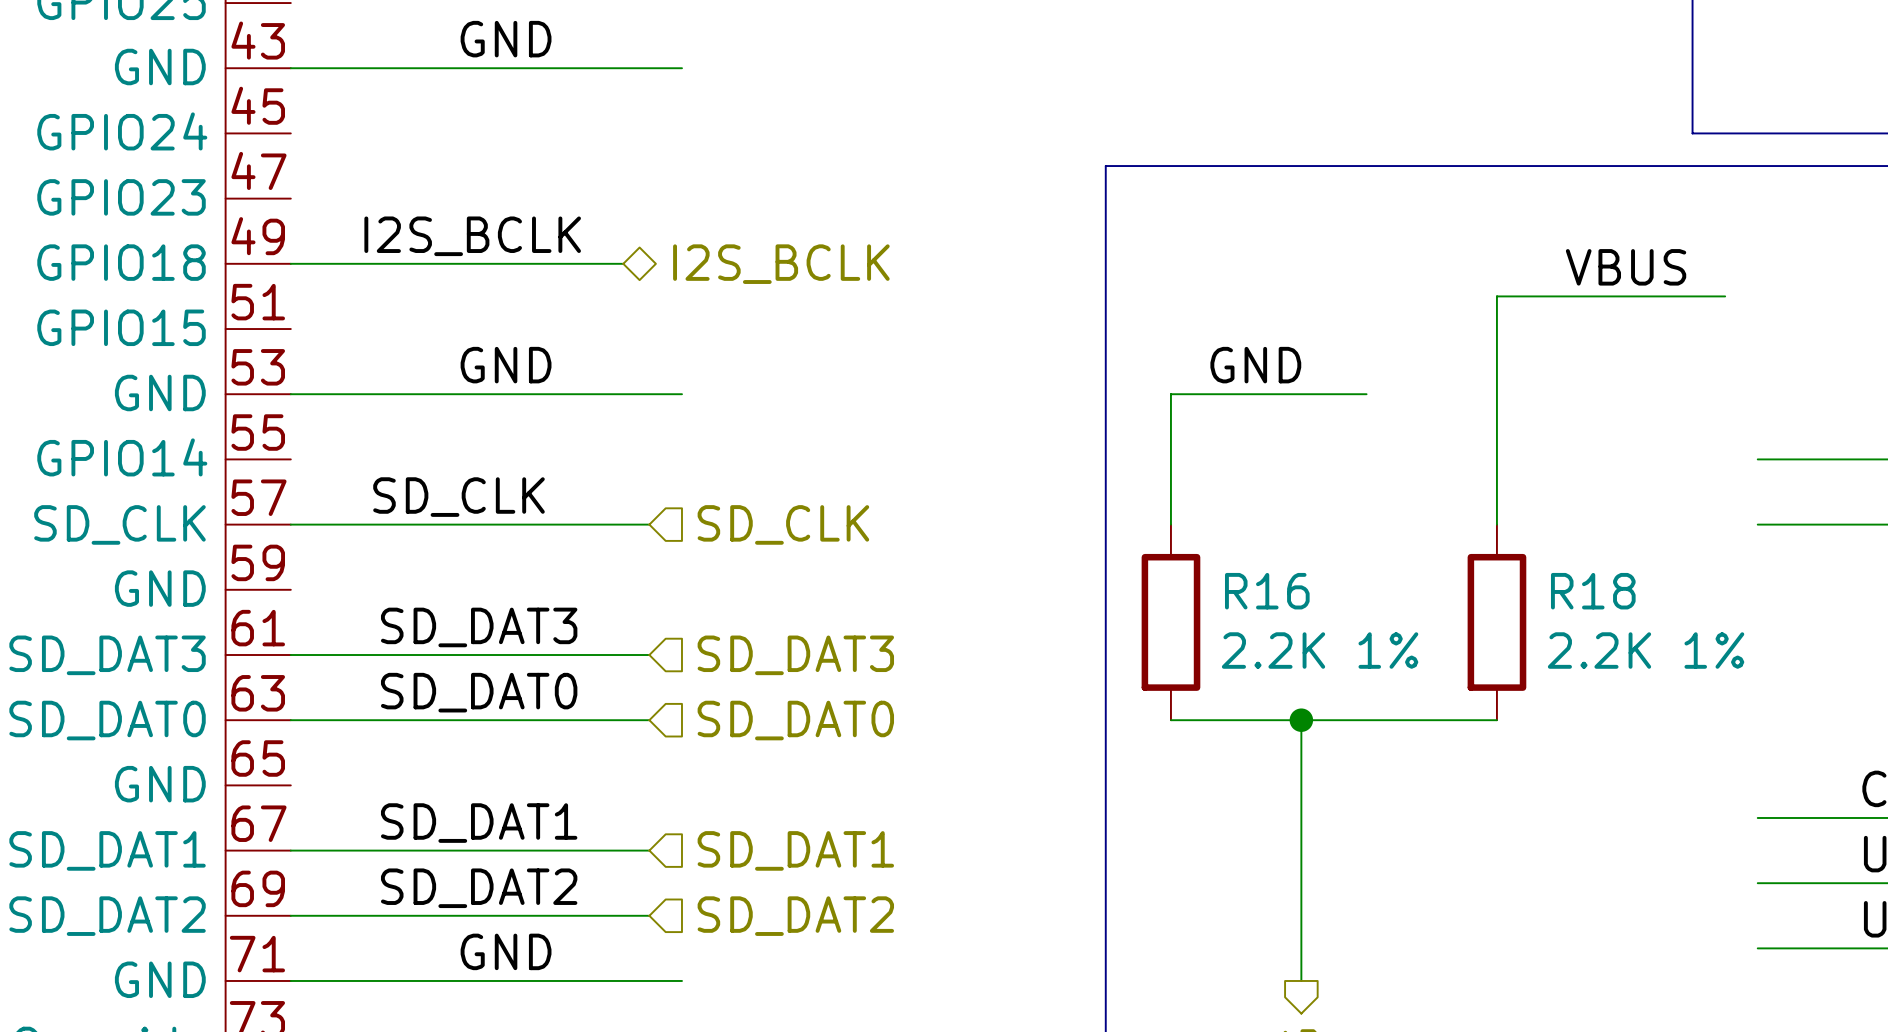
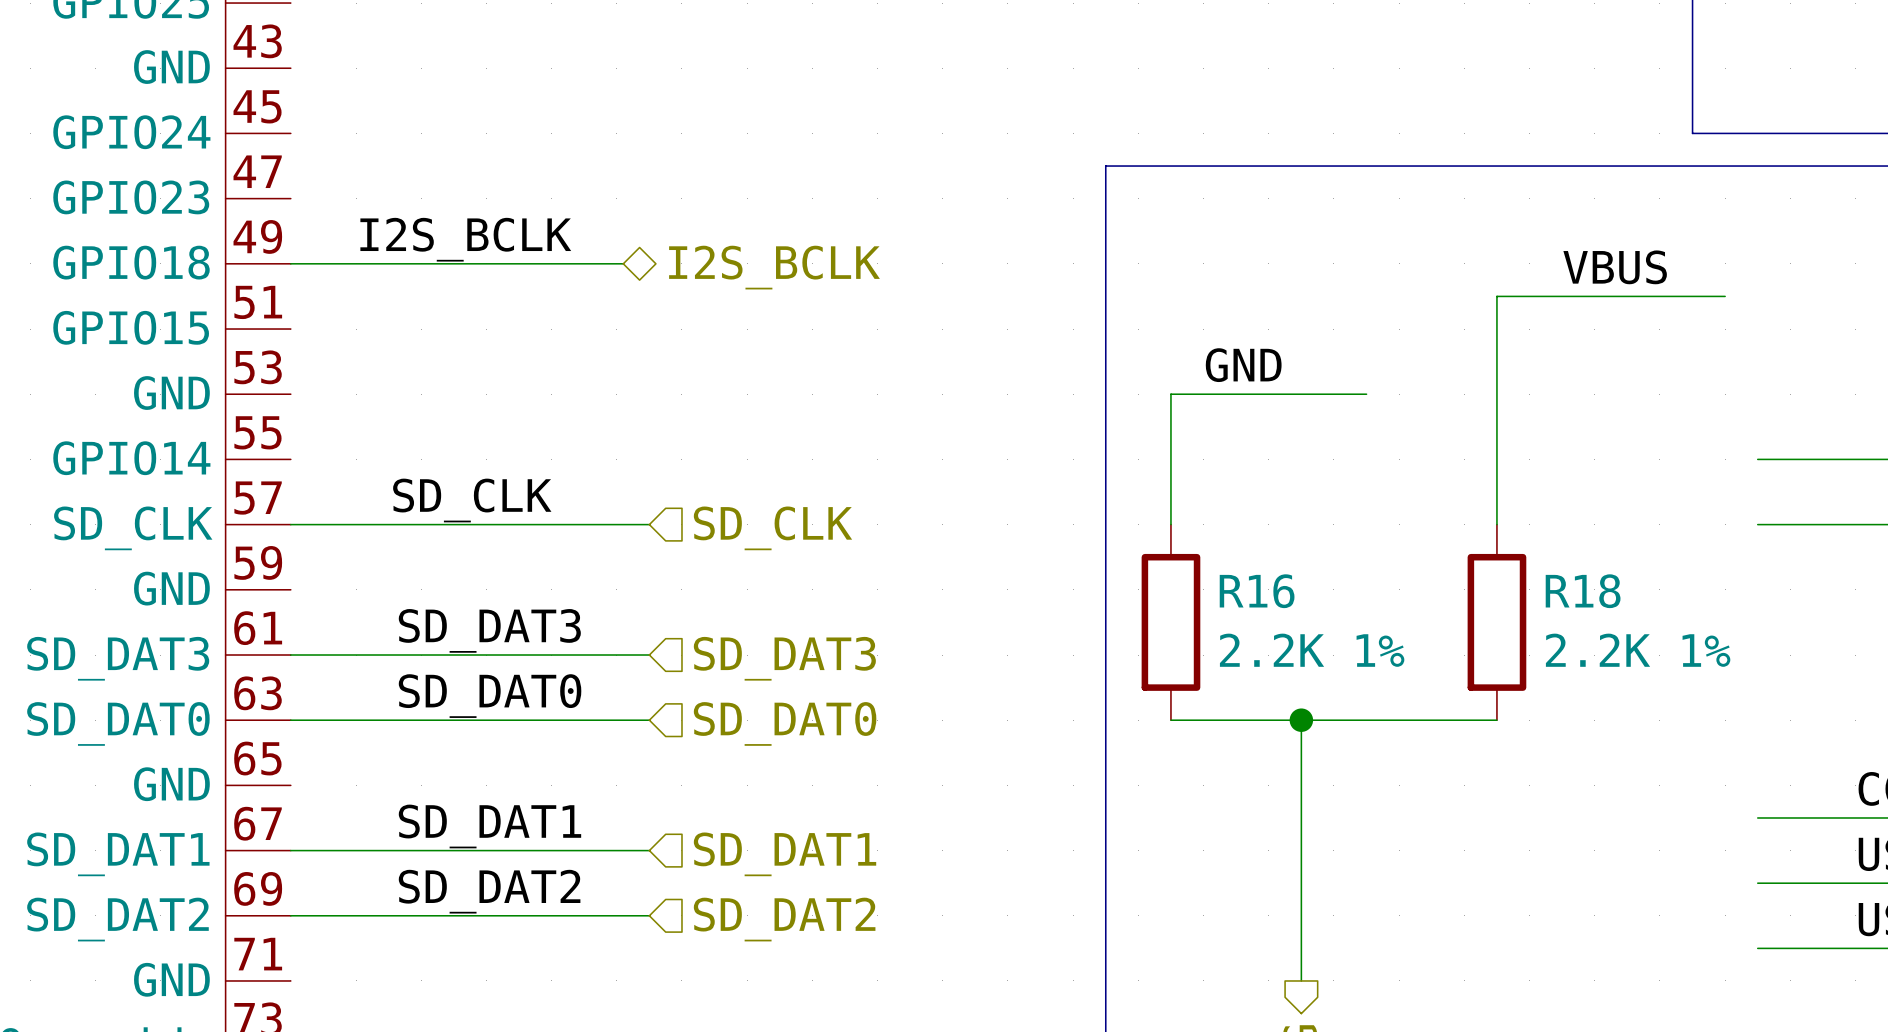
label: GND (506, 39) -> none
wire: (290, 68) (681, 68) -> none
label: GND (506, 365) -> none
wire: (290, 394) (681, 394) -> none
label: GND (506, 951) -> none
wire: (290, 980) (681, 980) -> none

